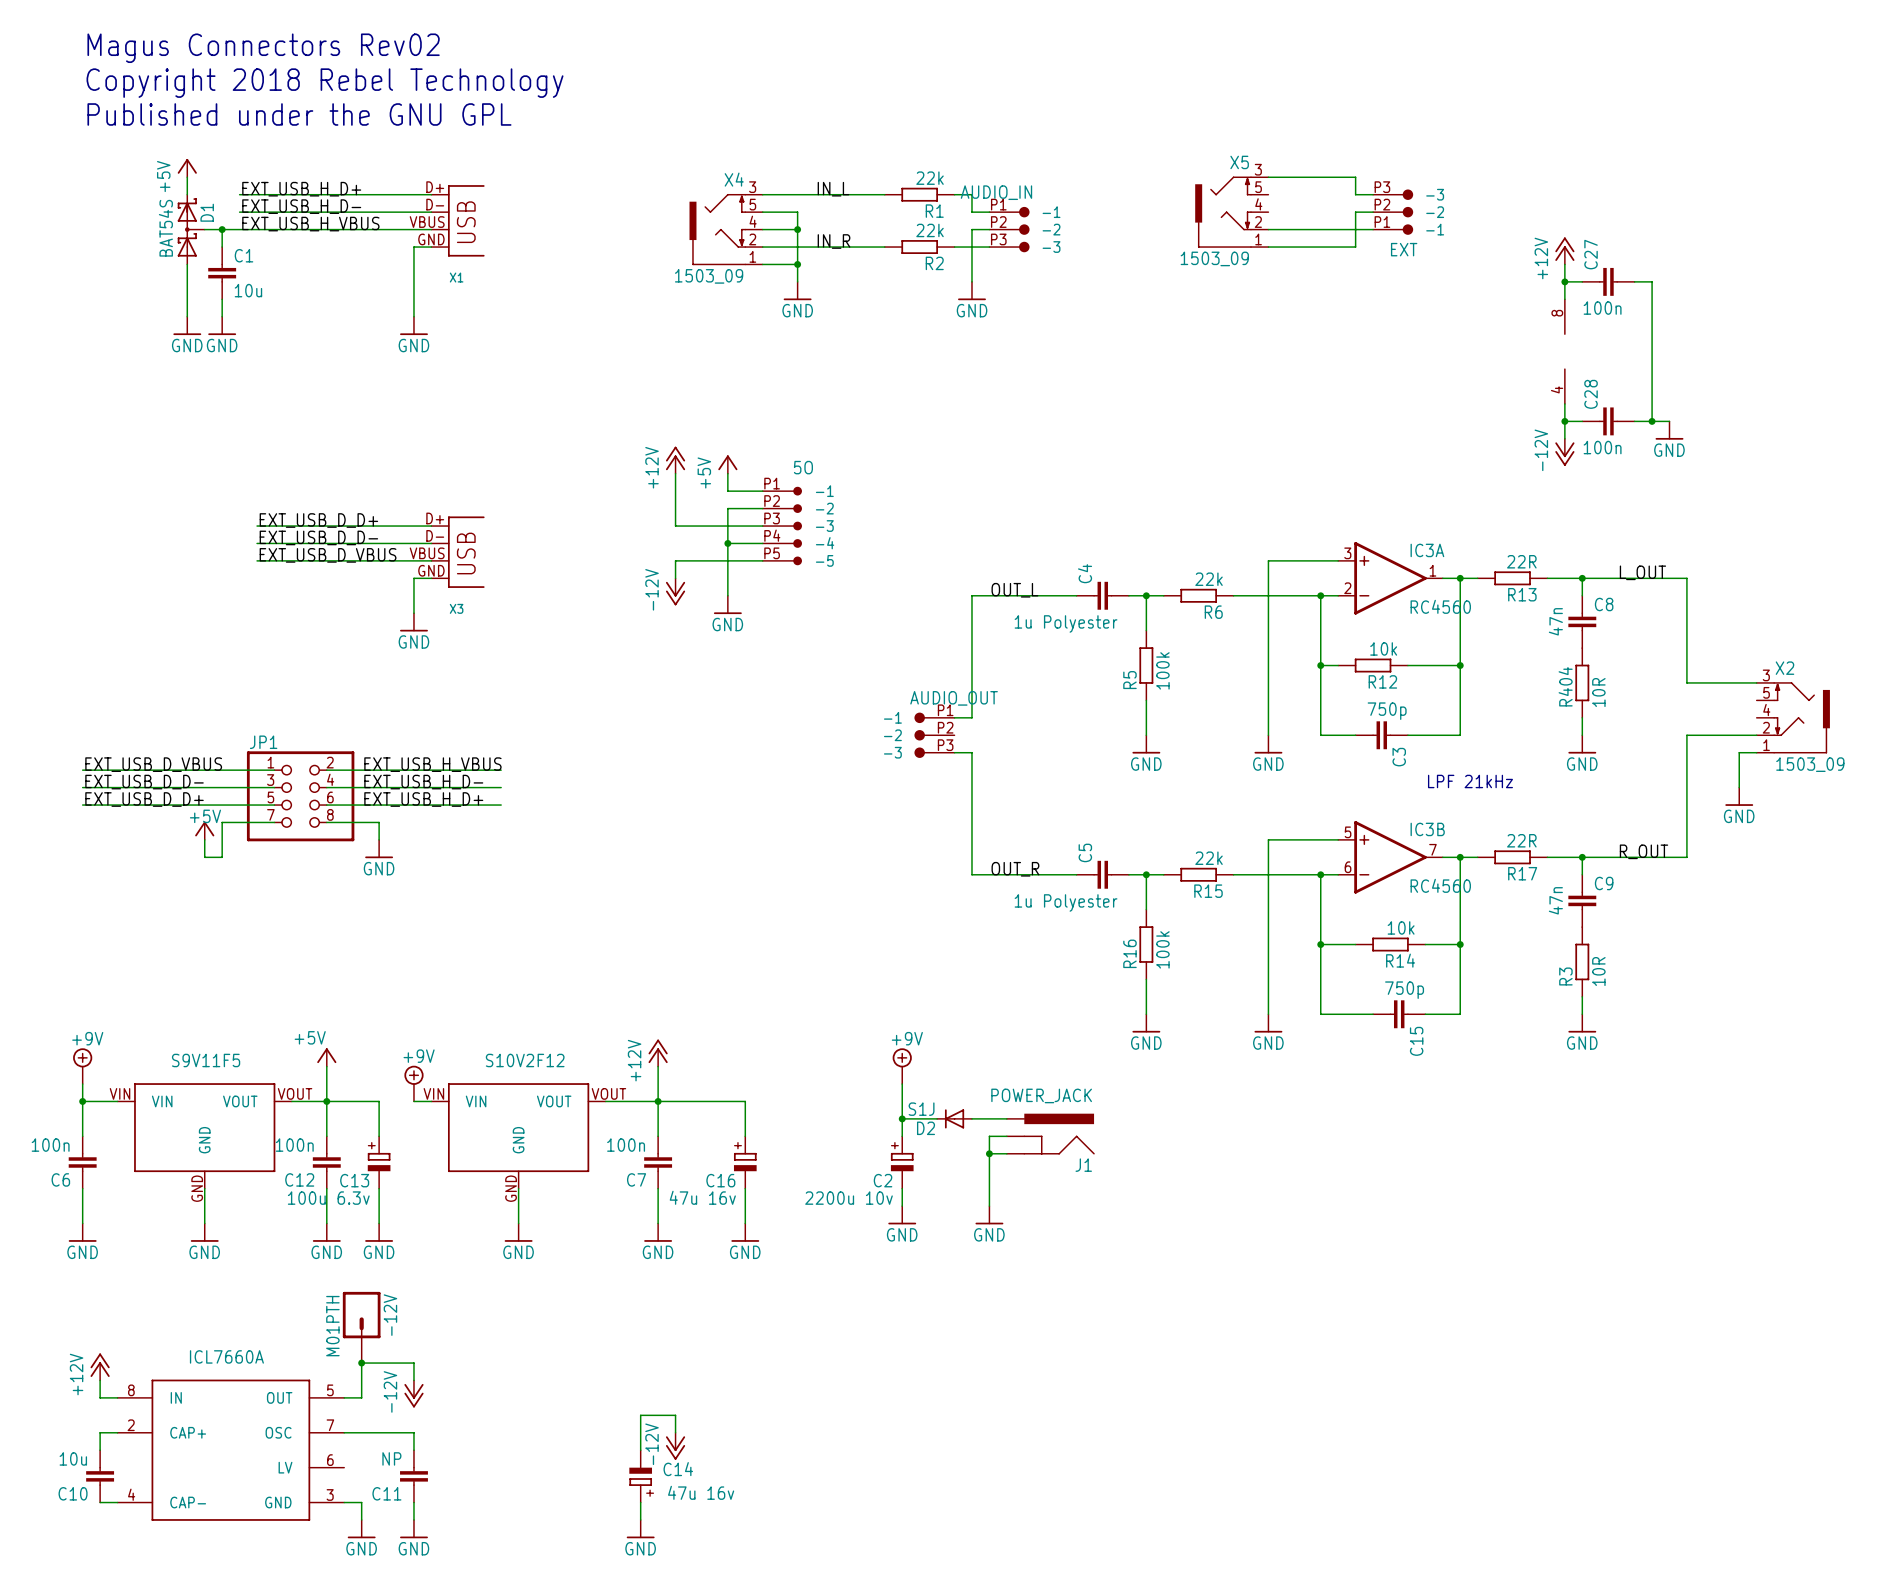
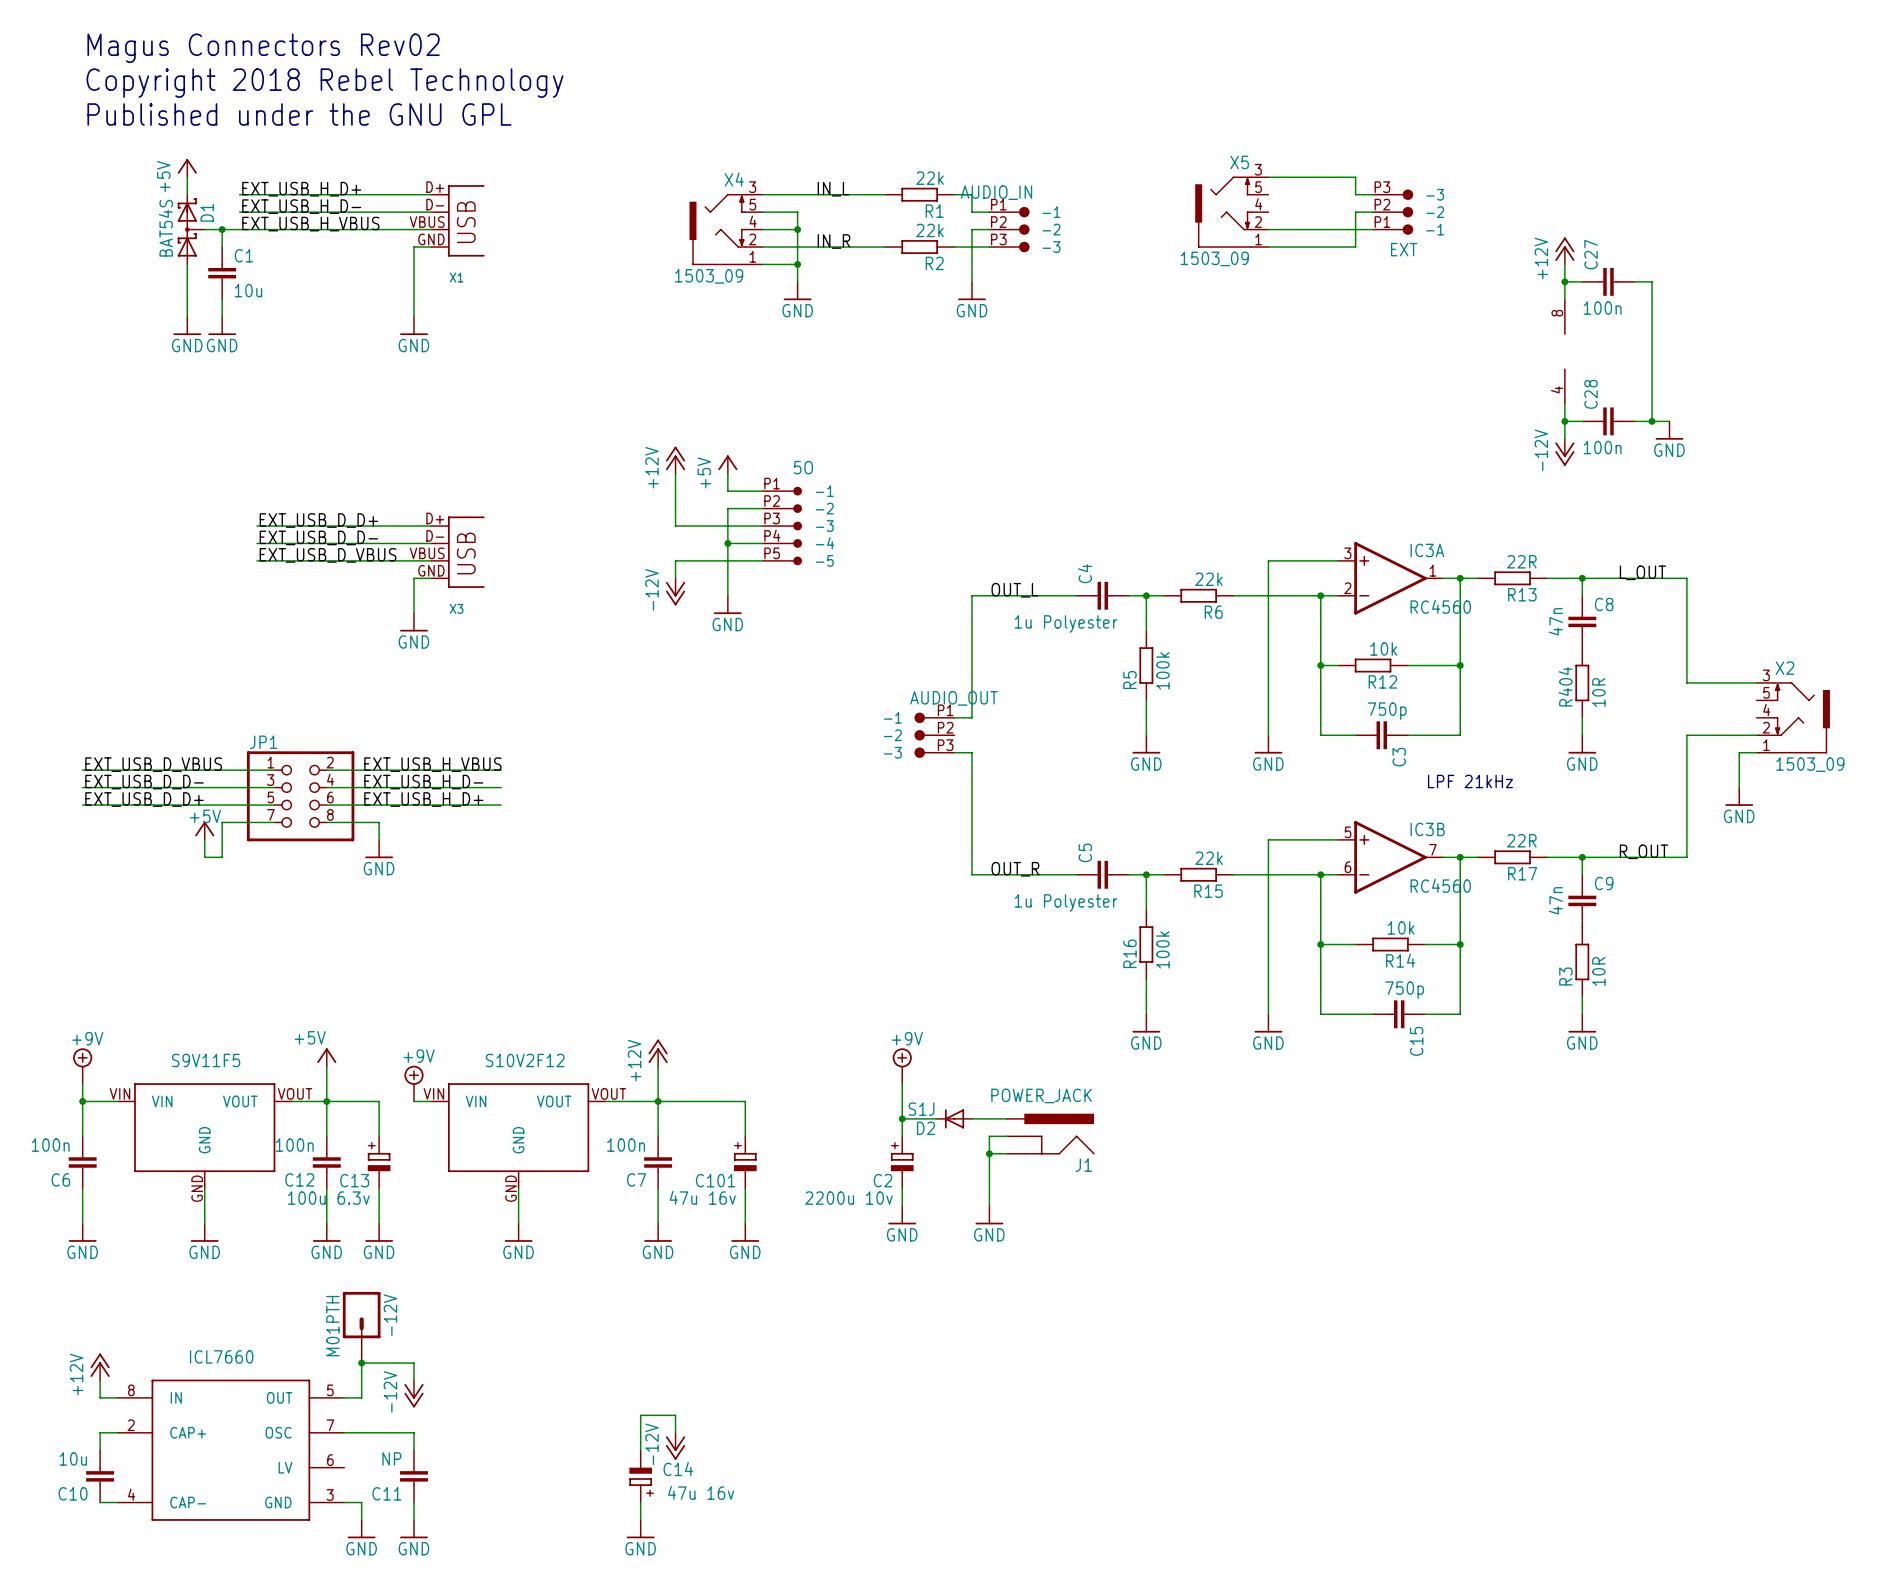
C16 name: C16 (720, 1180) -> C101 (715, 1180)
part value: ICL7660A (226, 1356) -> ICL7660 (221, 1356)

